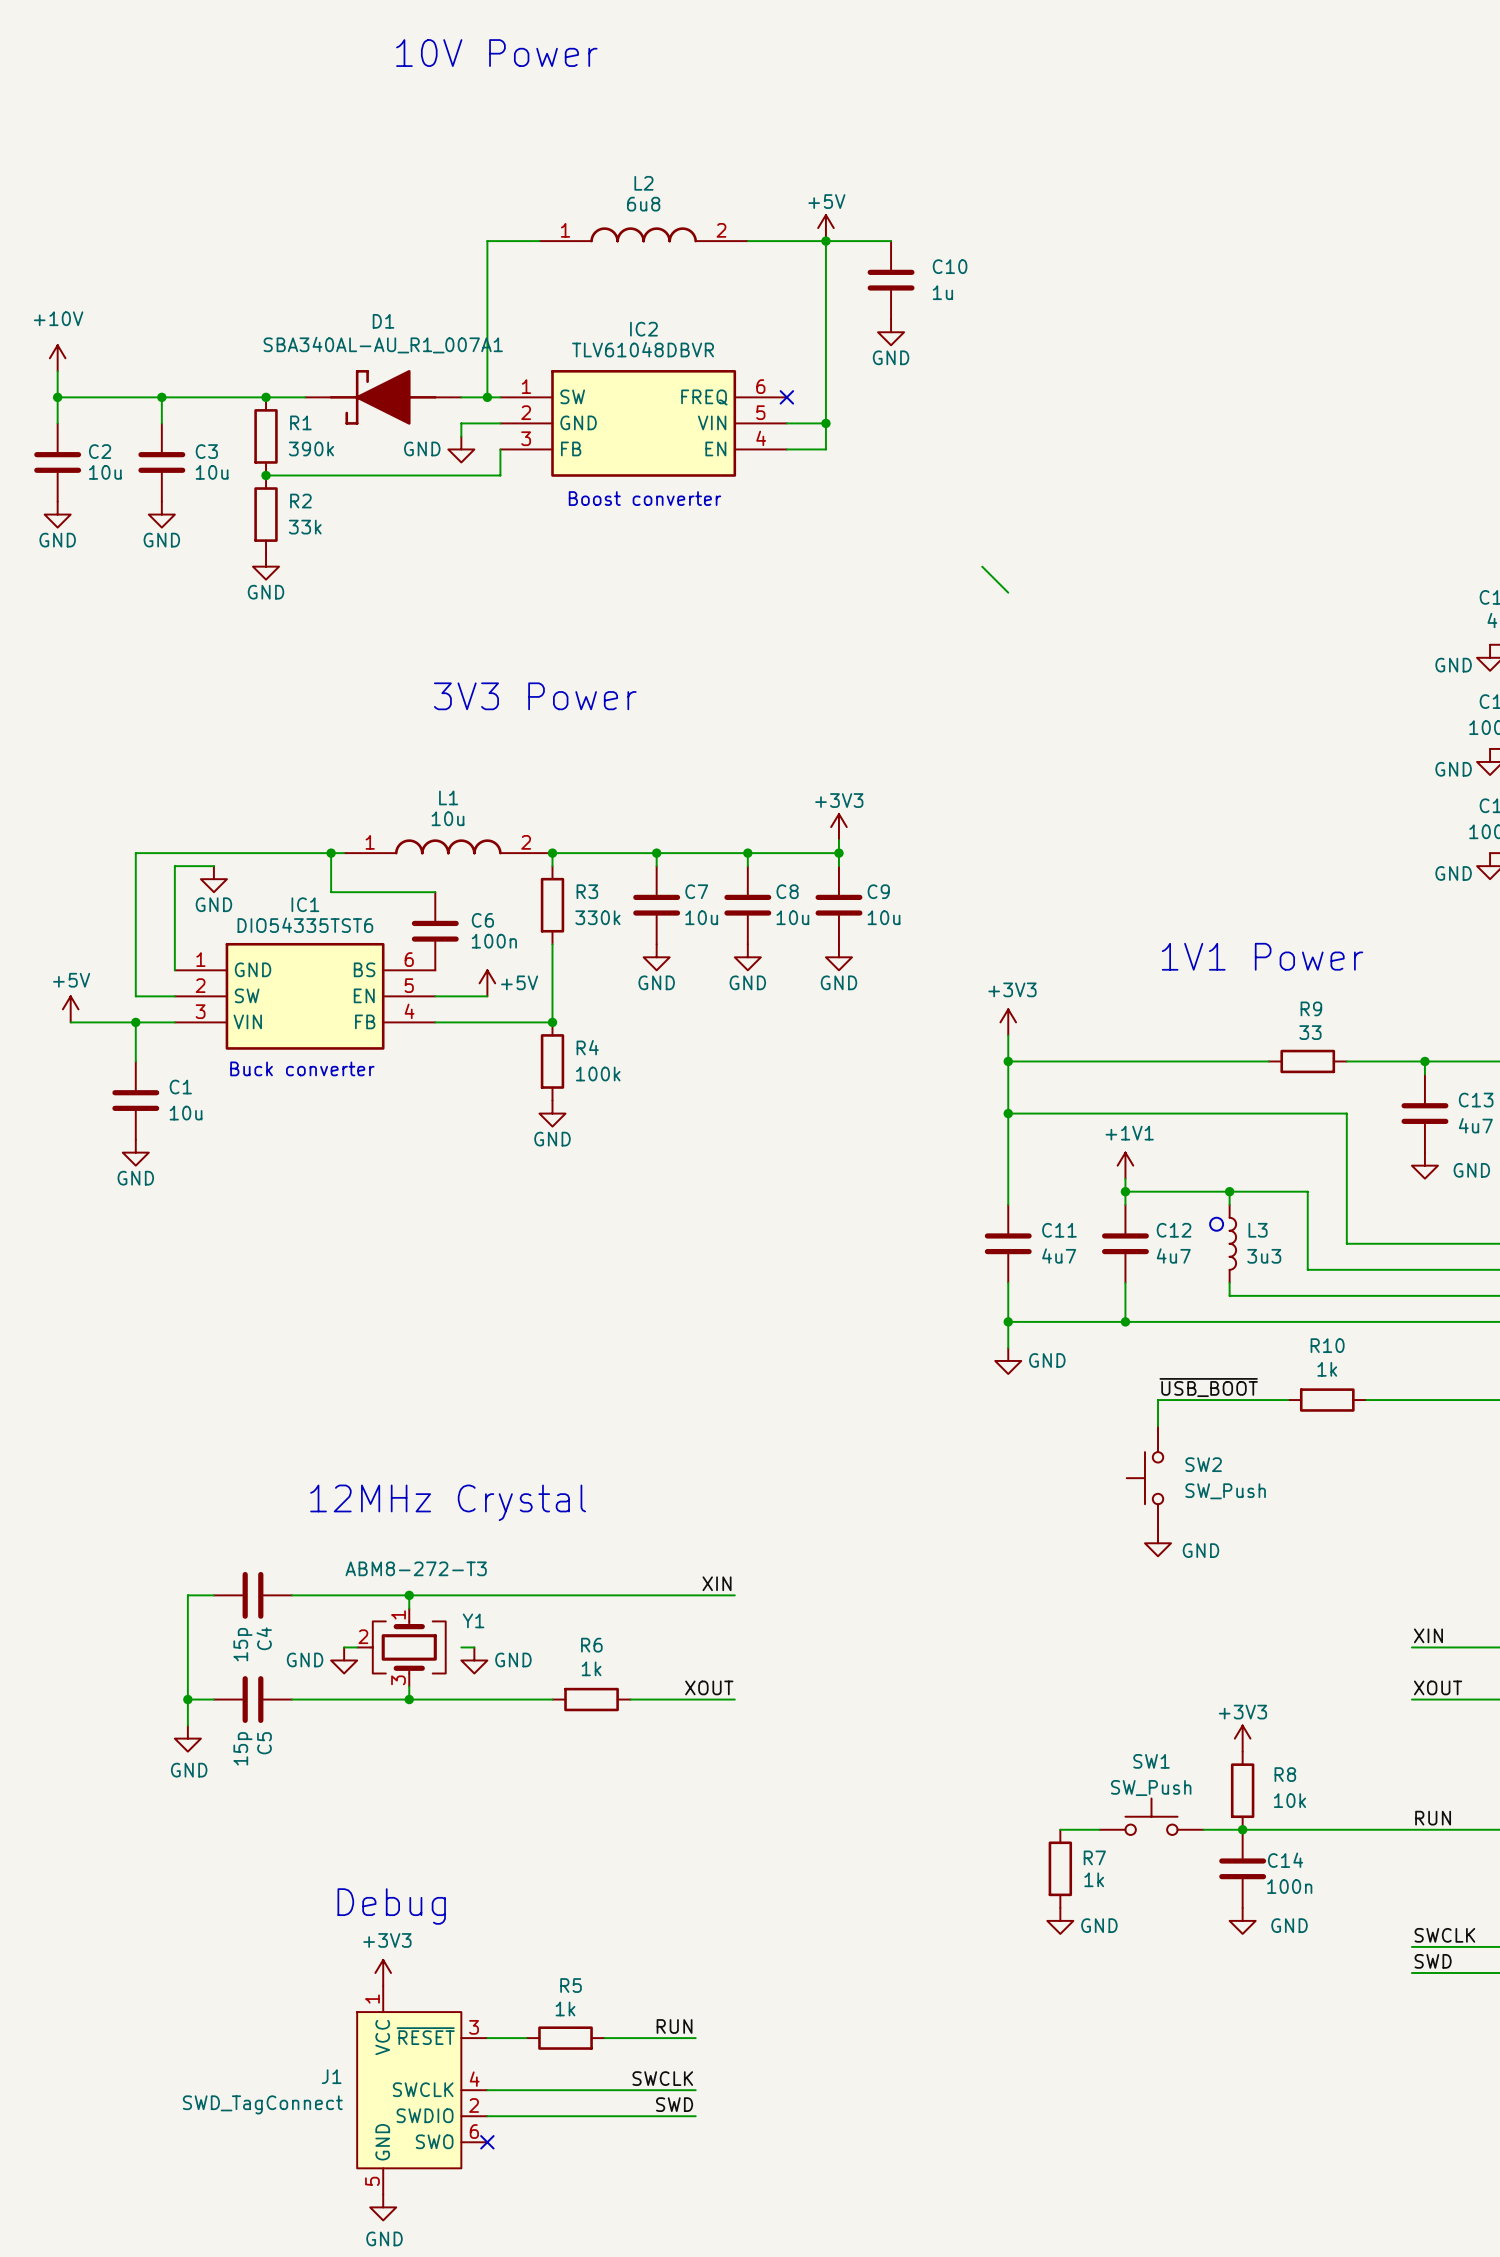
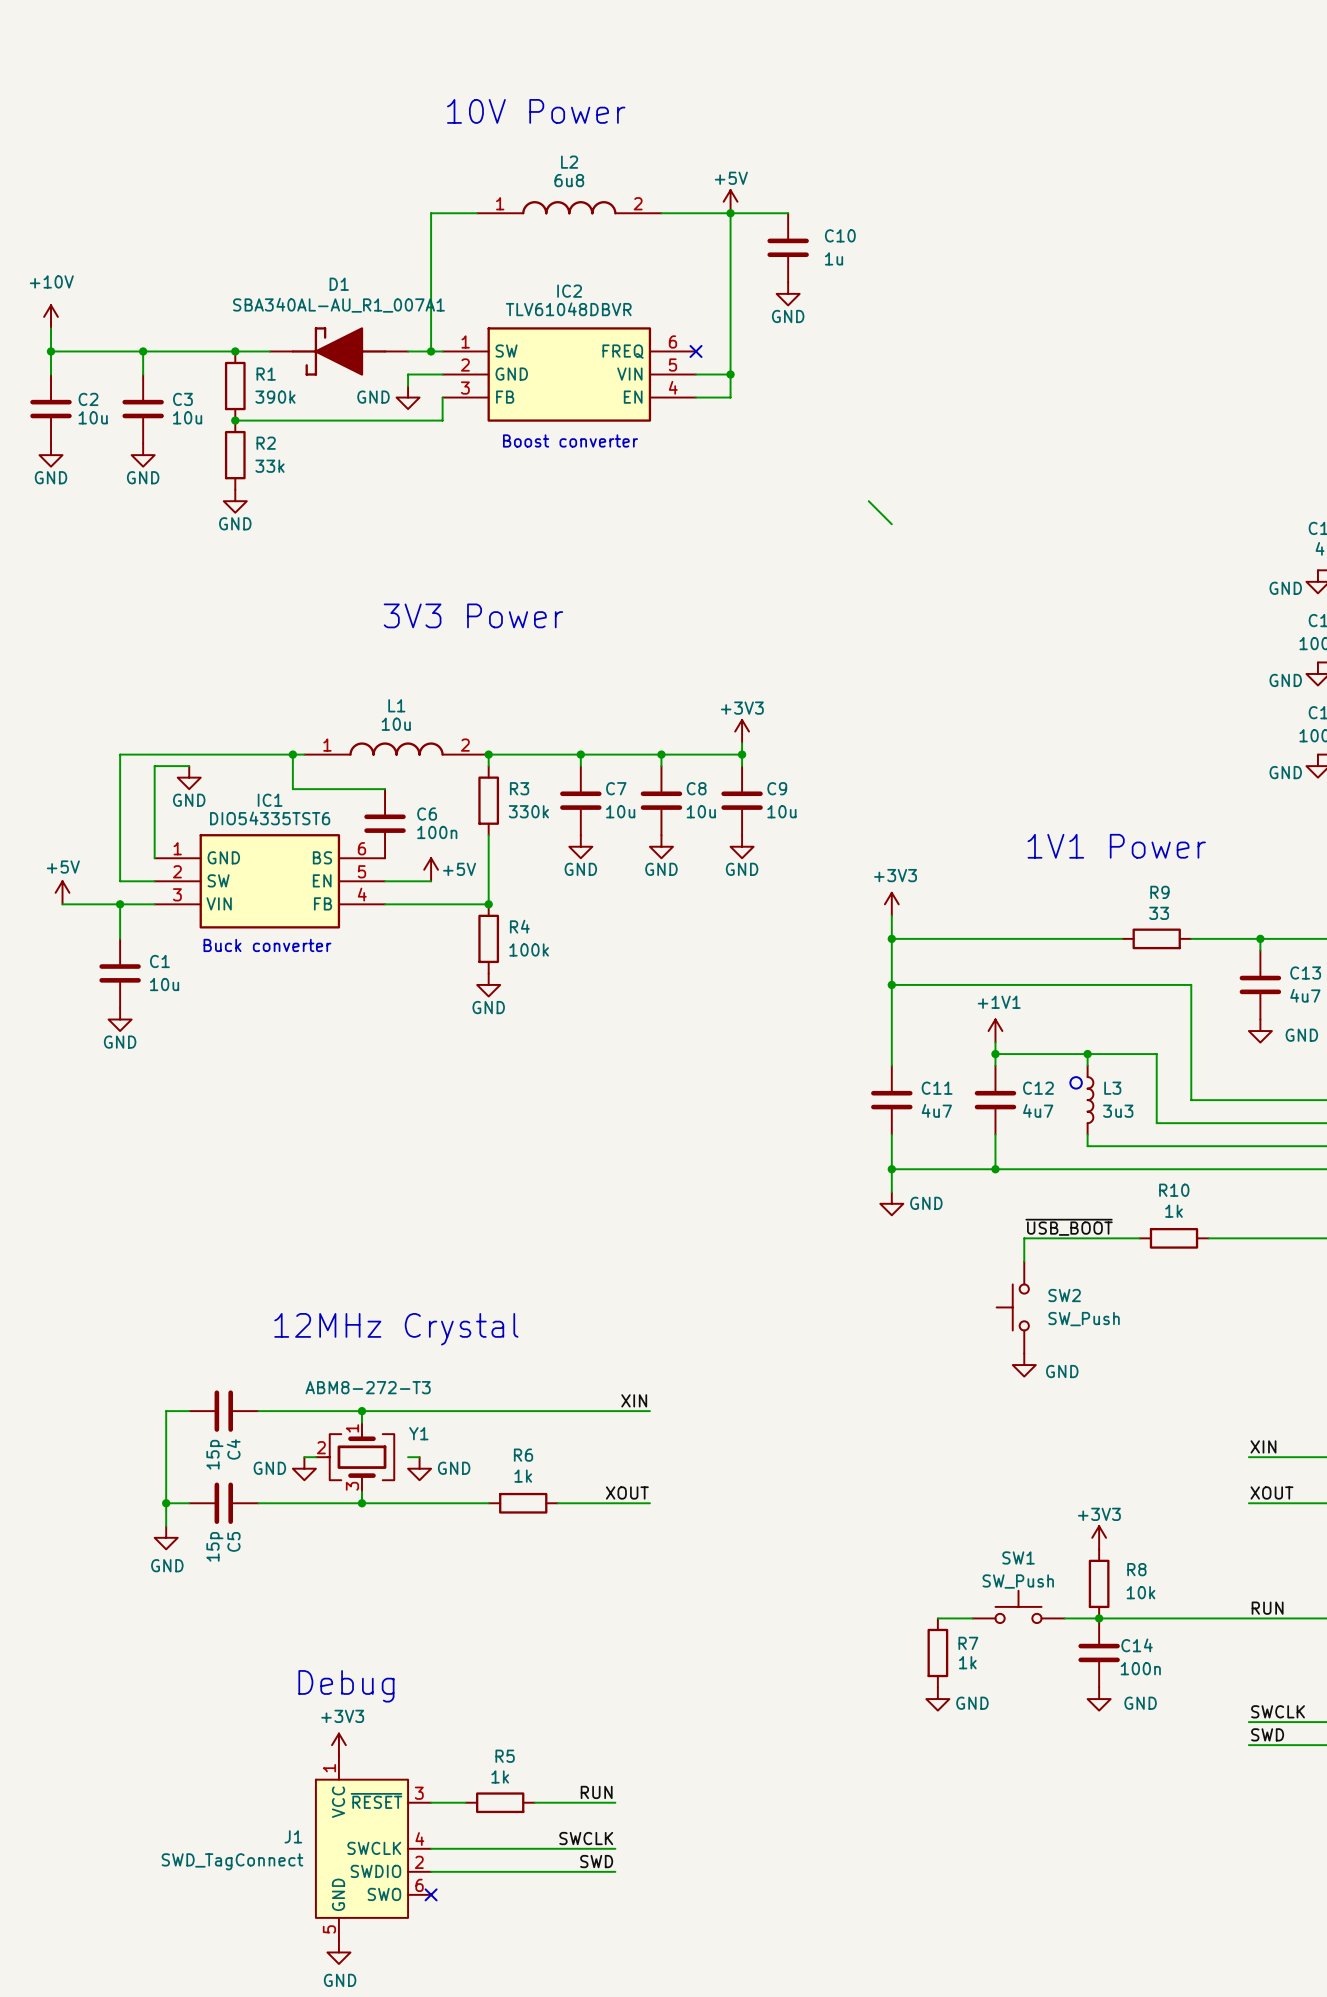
text position: 10V Power (496, 53) -> 10V Power (536, 111)

